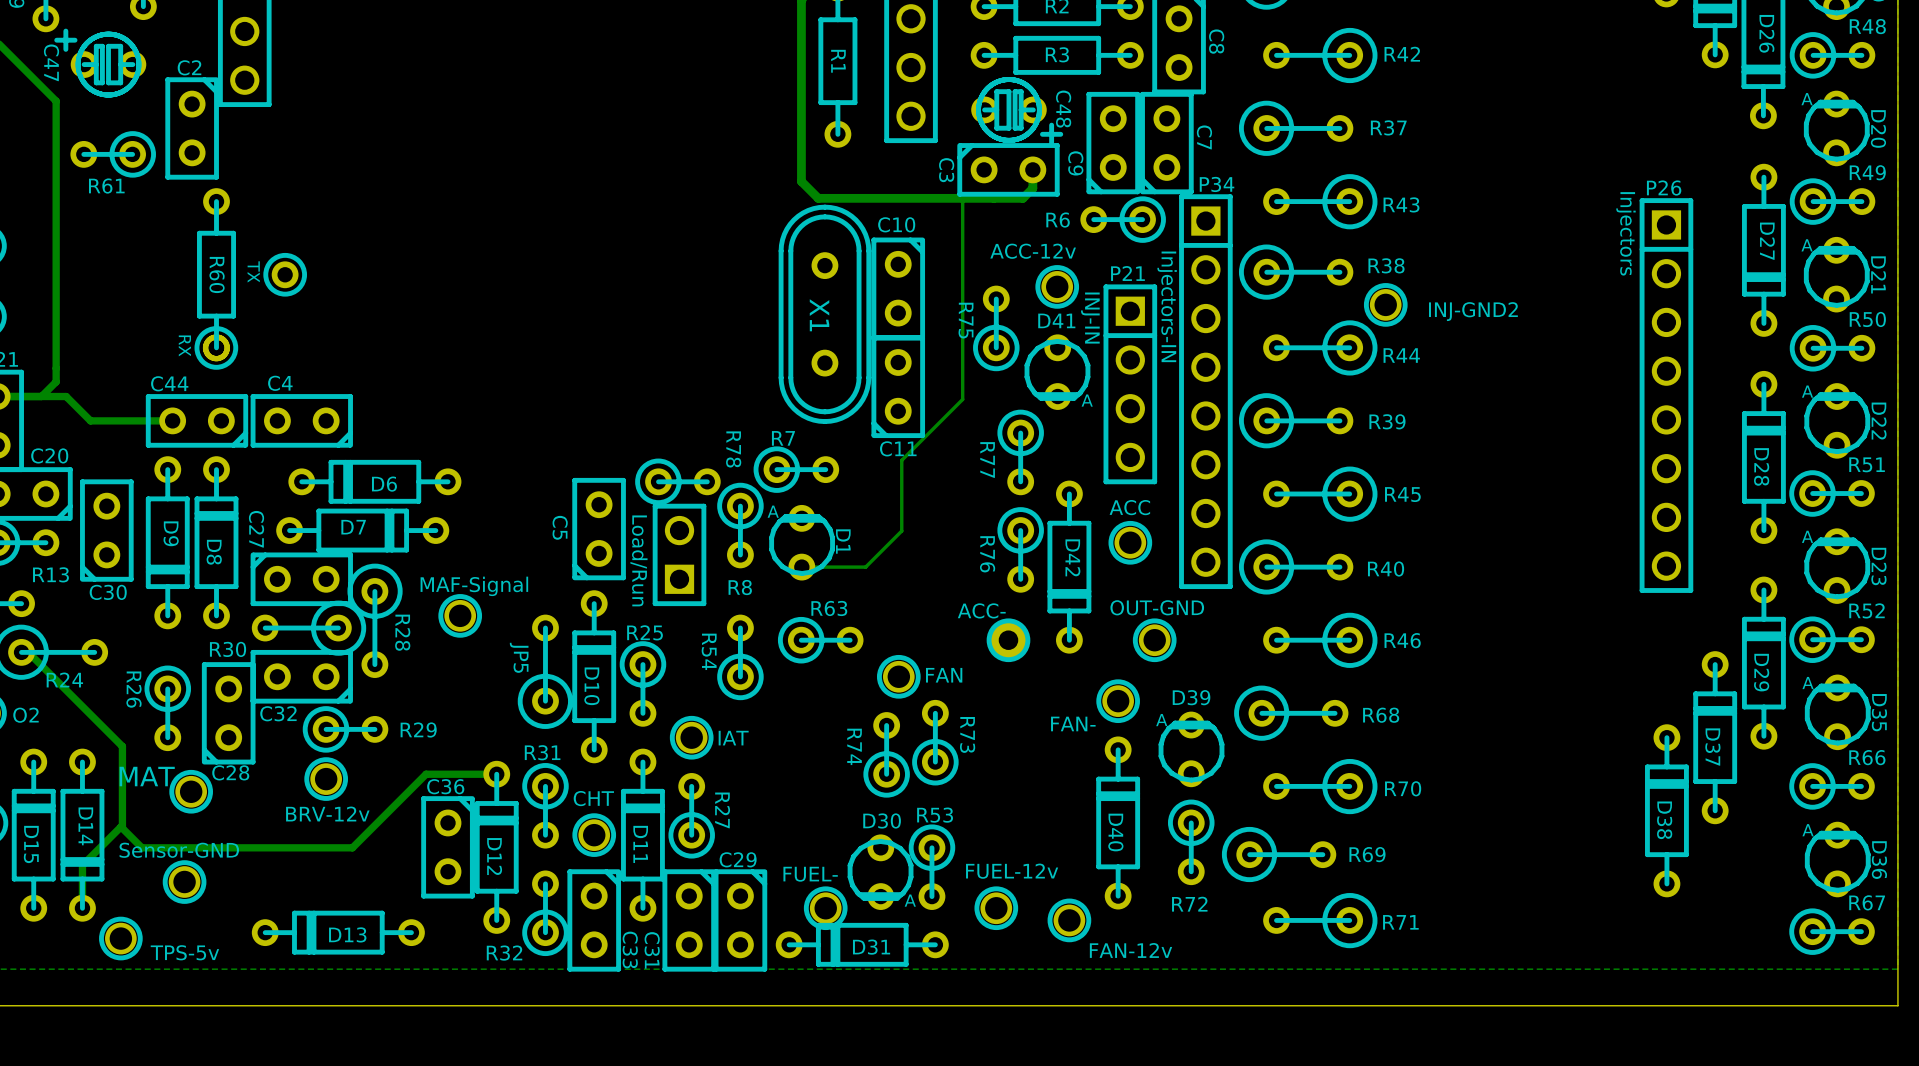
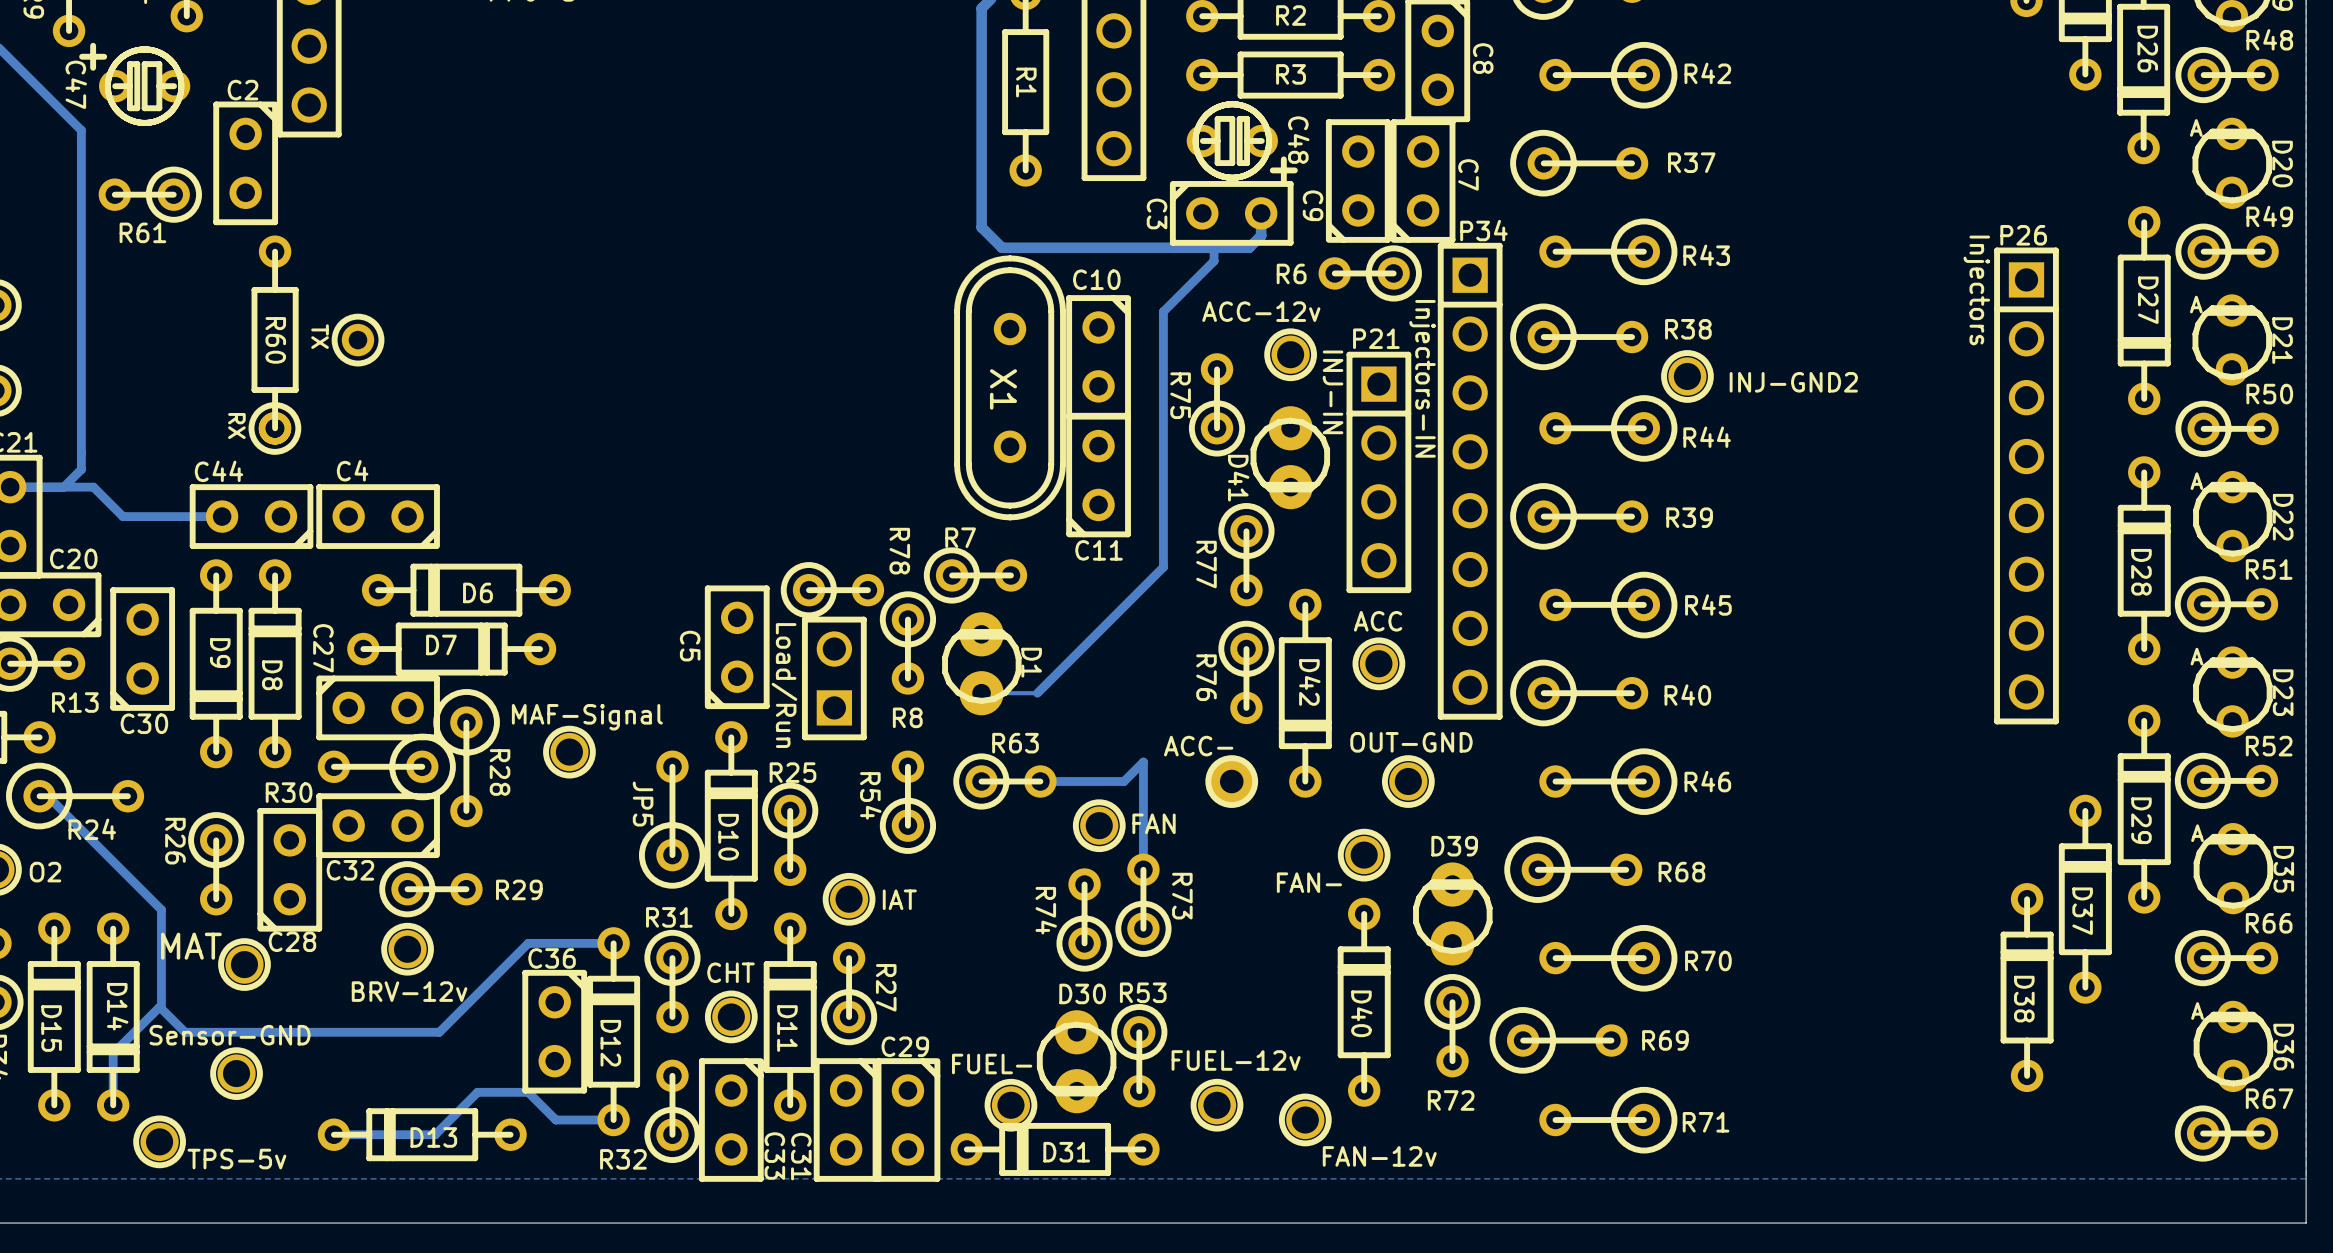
track: (962, 198) (962, 399) (901, 460) (901, 531) (865, 567) (847, 567) -> (1214, 247) (1214, 261) (1163, 311) (1163, 567) (1037, 693)
D41 name position: D41 (1056, 320) -> D41 (1238, 478)
D41 footprint: [1024, 334, 1091, 410] -> [1250, 406, 1331, 510]
D1 footprint: [769, 504, 835, 581] -> [942, 612, 1022, 716]
track: none -> (1040, 781) (1124, 781) (1143, 762) (1143, 869)
D39 footprint: [1158, 711, 1225, 788] -> [1413, 862, 1493, 966]
D30 footprint: [847, 834, 914, 910] -> [1036, 1010, 1117, 1114]
track: none -> (613, 1120) (555, 1120) (528, 1092) (477, 1092) (435, 1134) (333, 1134)

